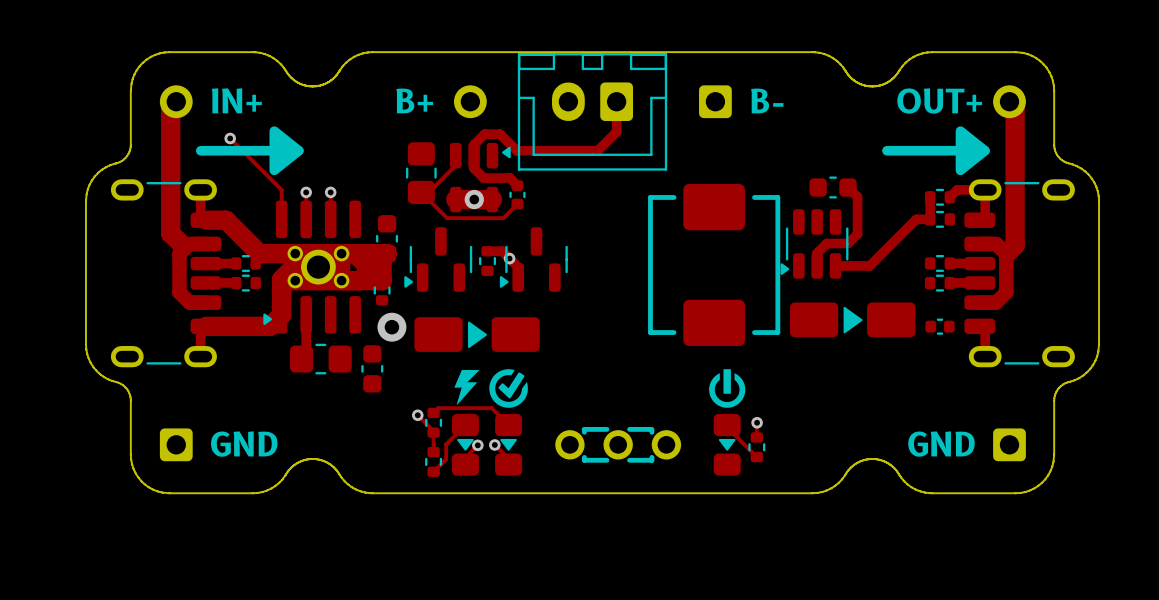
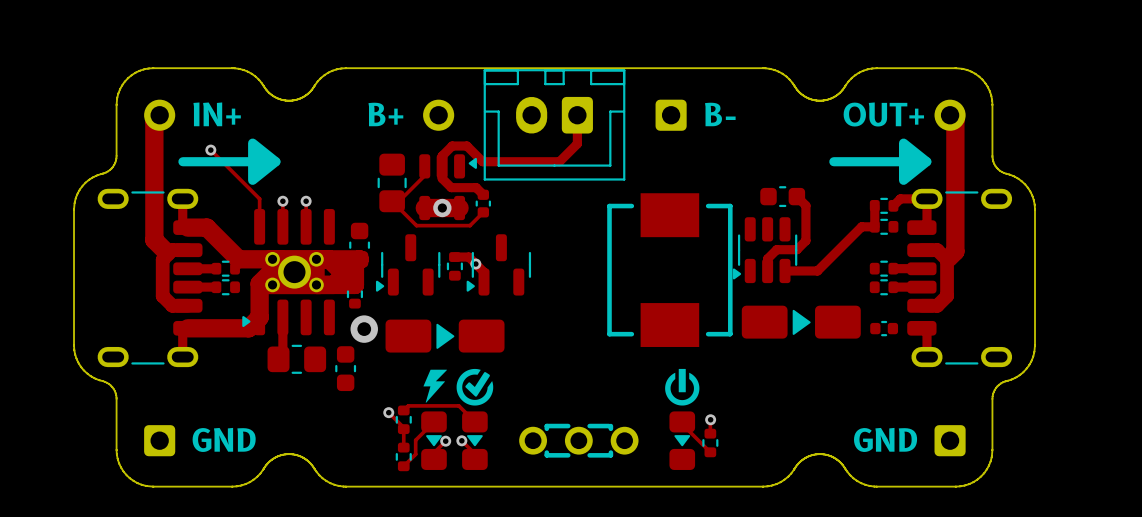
part footprint: [648, 183, 781, 347] -> [607, 193, 733, 347]

